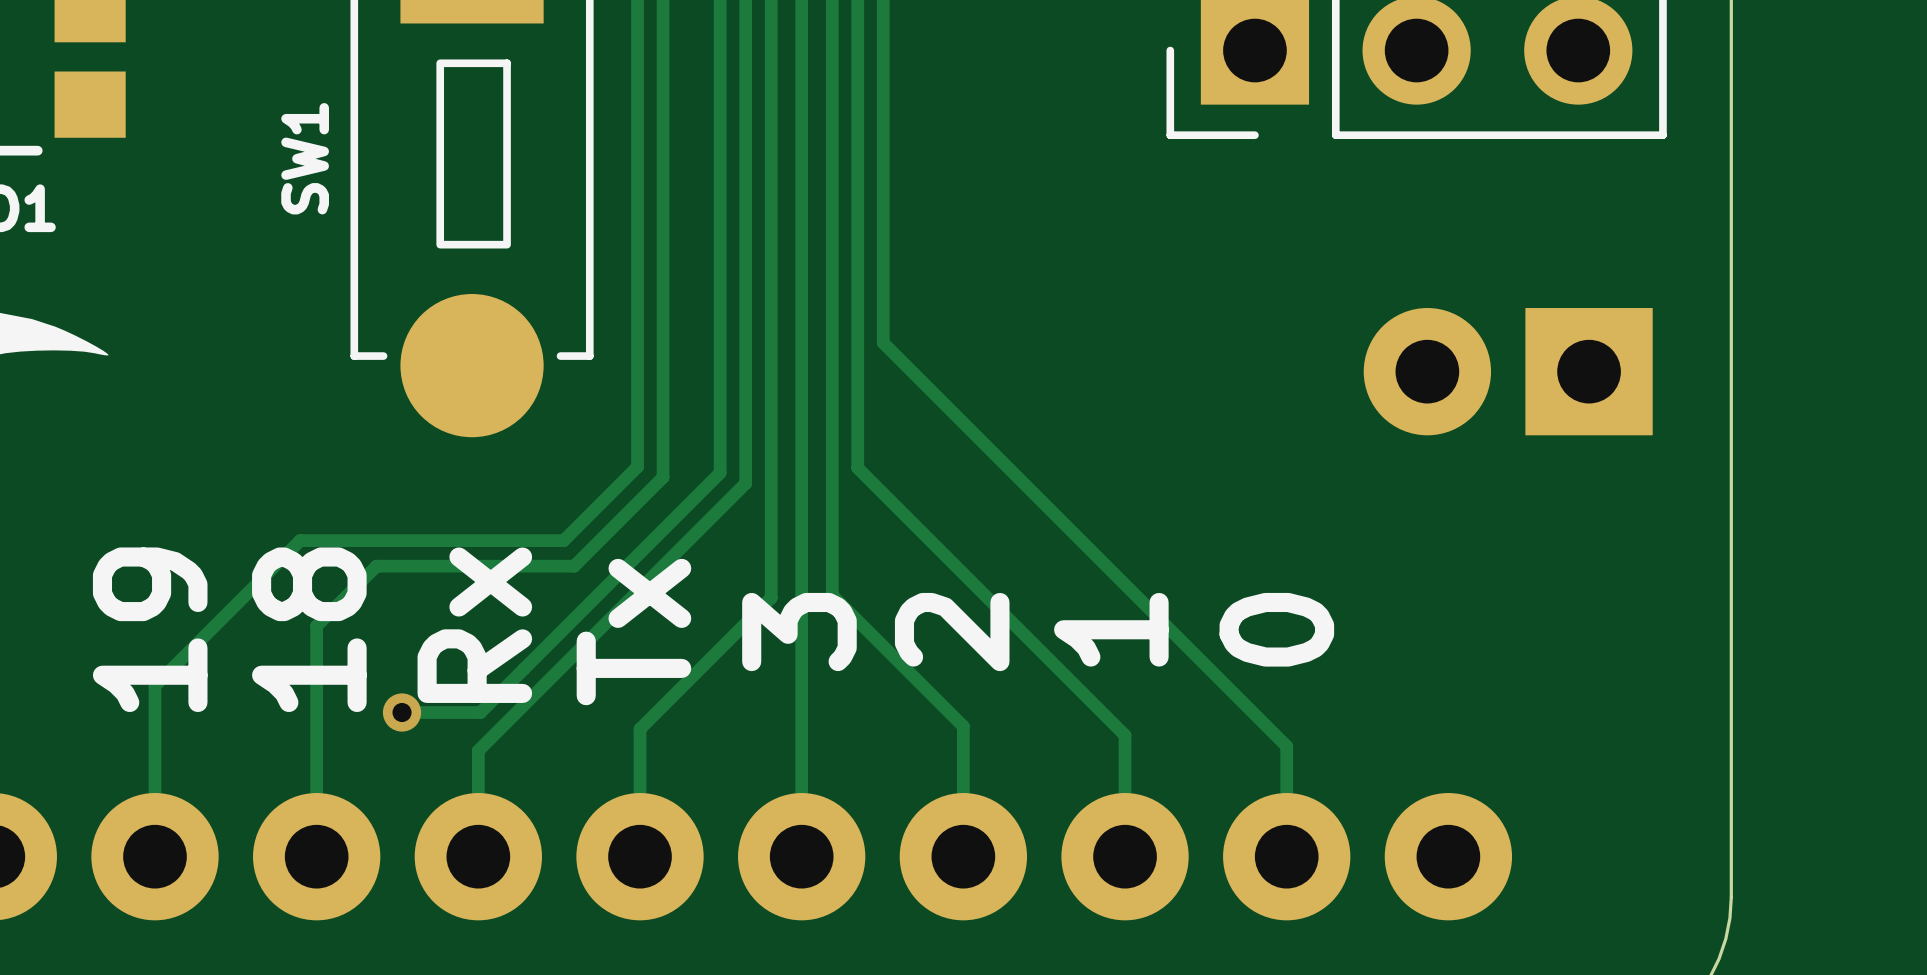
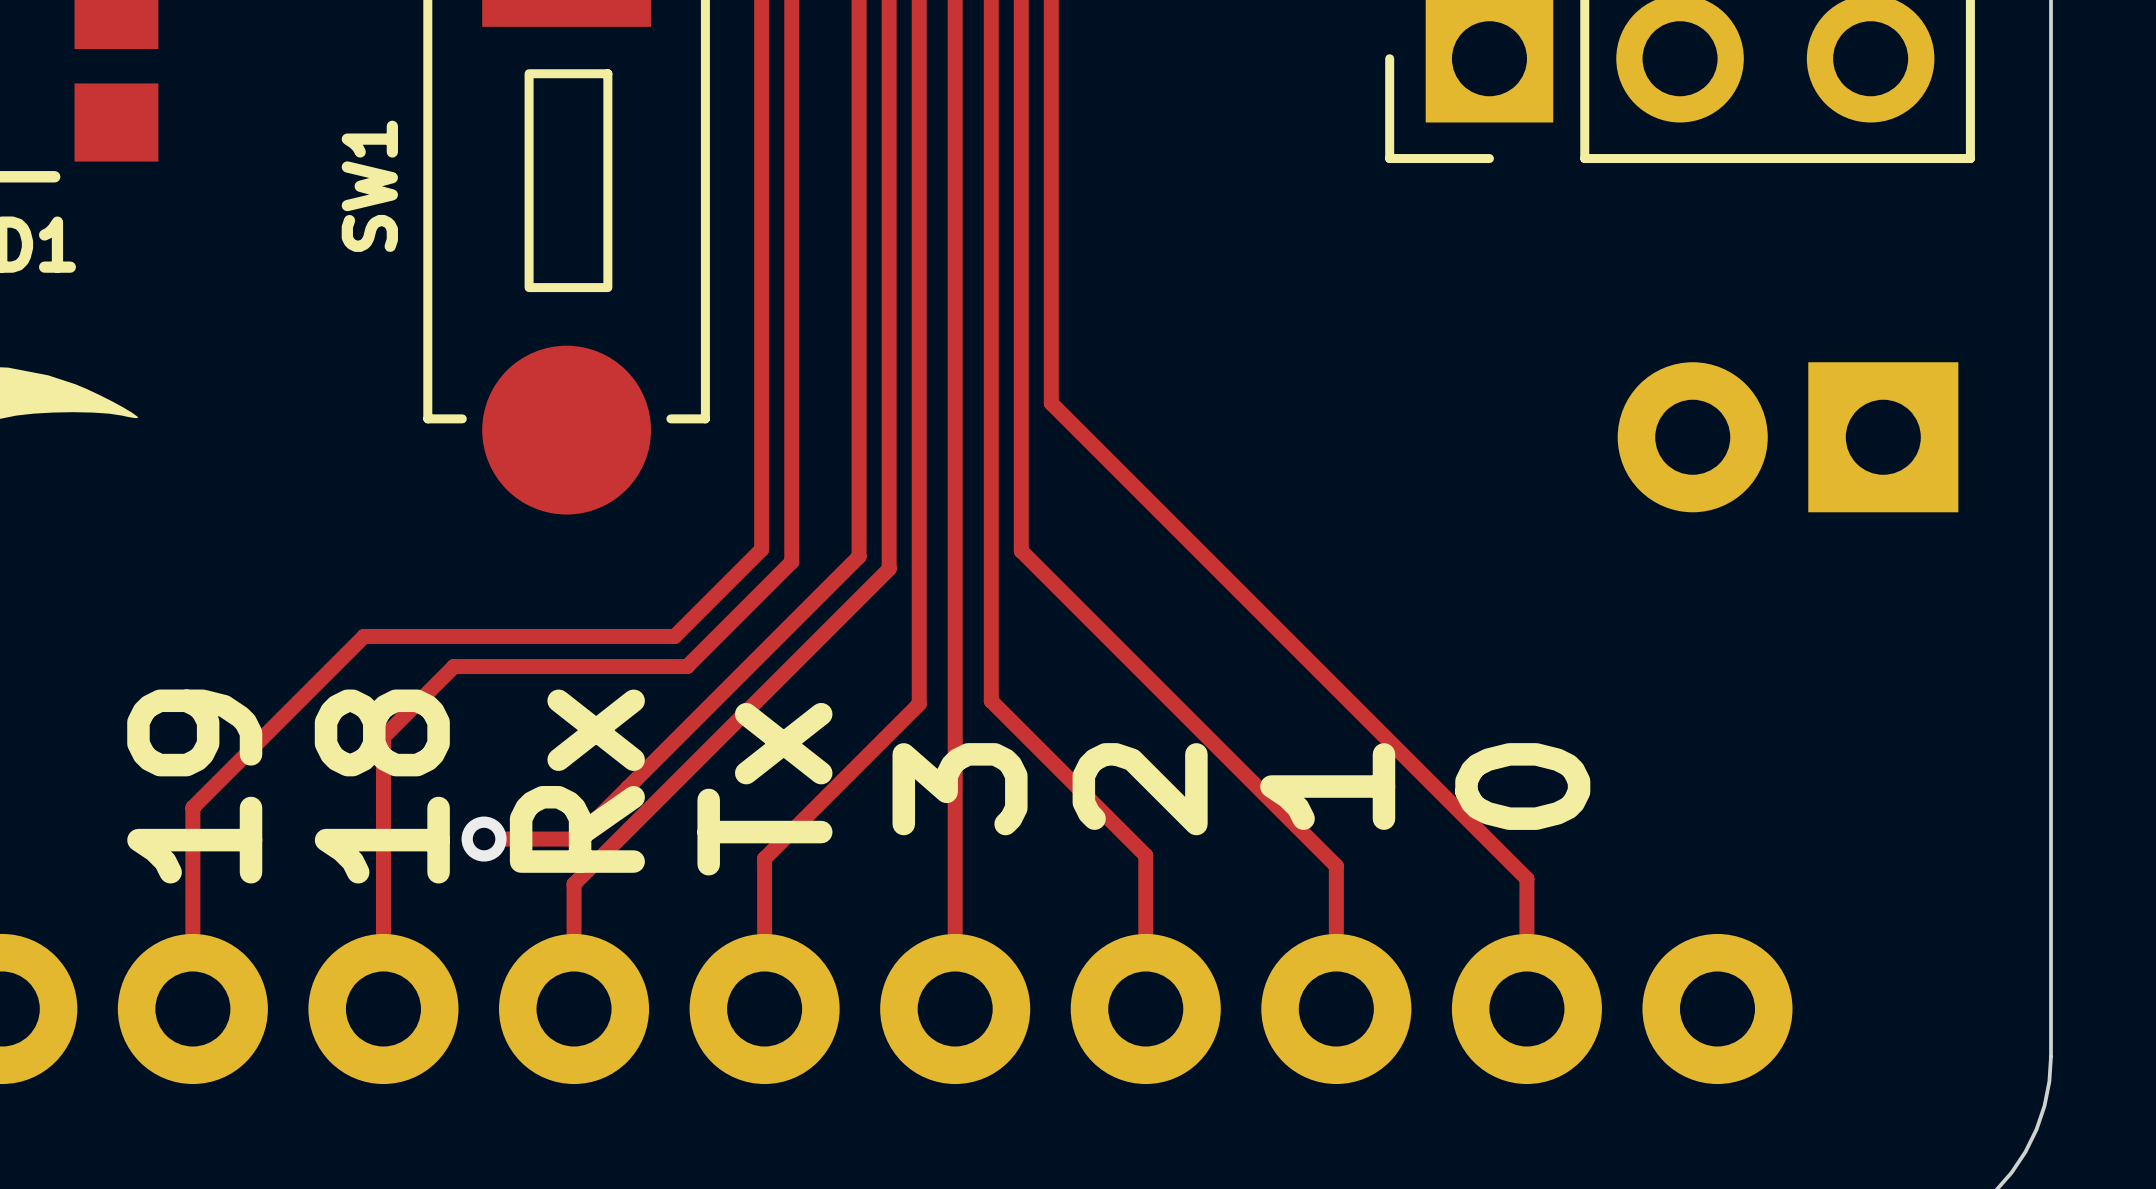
text position: Rx (474, 625) -> Rx (577, 781)
text position: 19 (150, 629) -> 19 (194, 786)
text position: 18 (309, 629) -> 18 (382, 786)
text position: 1 (1111, 629) -> 1 (1327, 786)
text position: 0 (1276, 629) -> 0 (1522, 786)
text position: Tx (633, 632) -> Tx (764, 789)
text position: 3 (799, 632) -> 3 (960, 789)
text position: 2 (952, 632) -> 2 (1140, 789)

